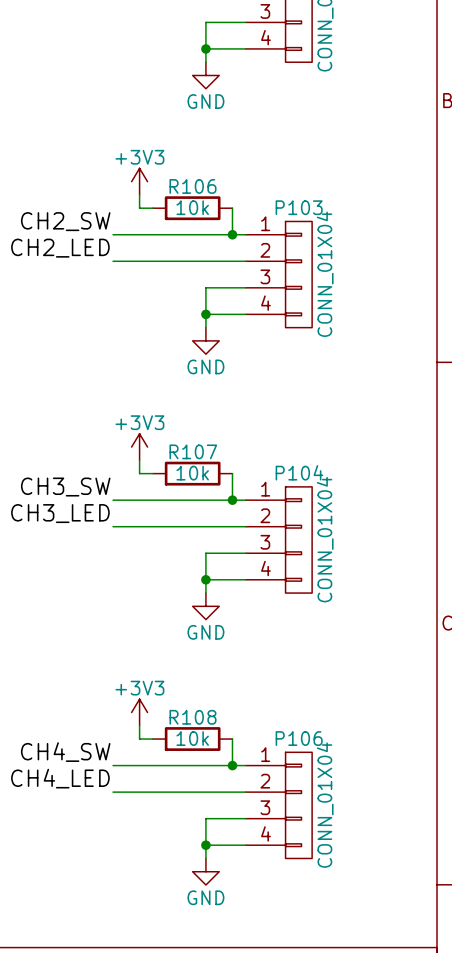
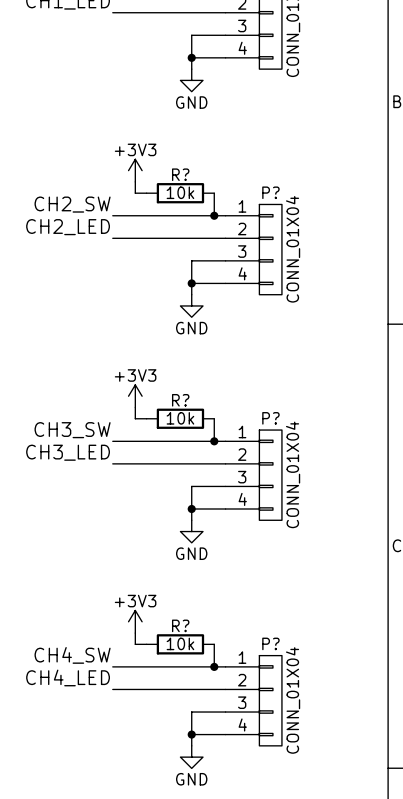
R106 name: R106 (192, 186) -> R? (180, 174)
P103 name: P103 (299, 207) -> P? (270, 192)
R107 name: R107 (193, 451) -> R? (180, 400)
P104 name: P104 (299, 472) -> P? (270, 418)
R108 name: R108 (192, 717) -> R? (180, 625)
P106 name: P106 (299, 738) -> P? (270, 643)

